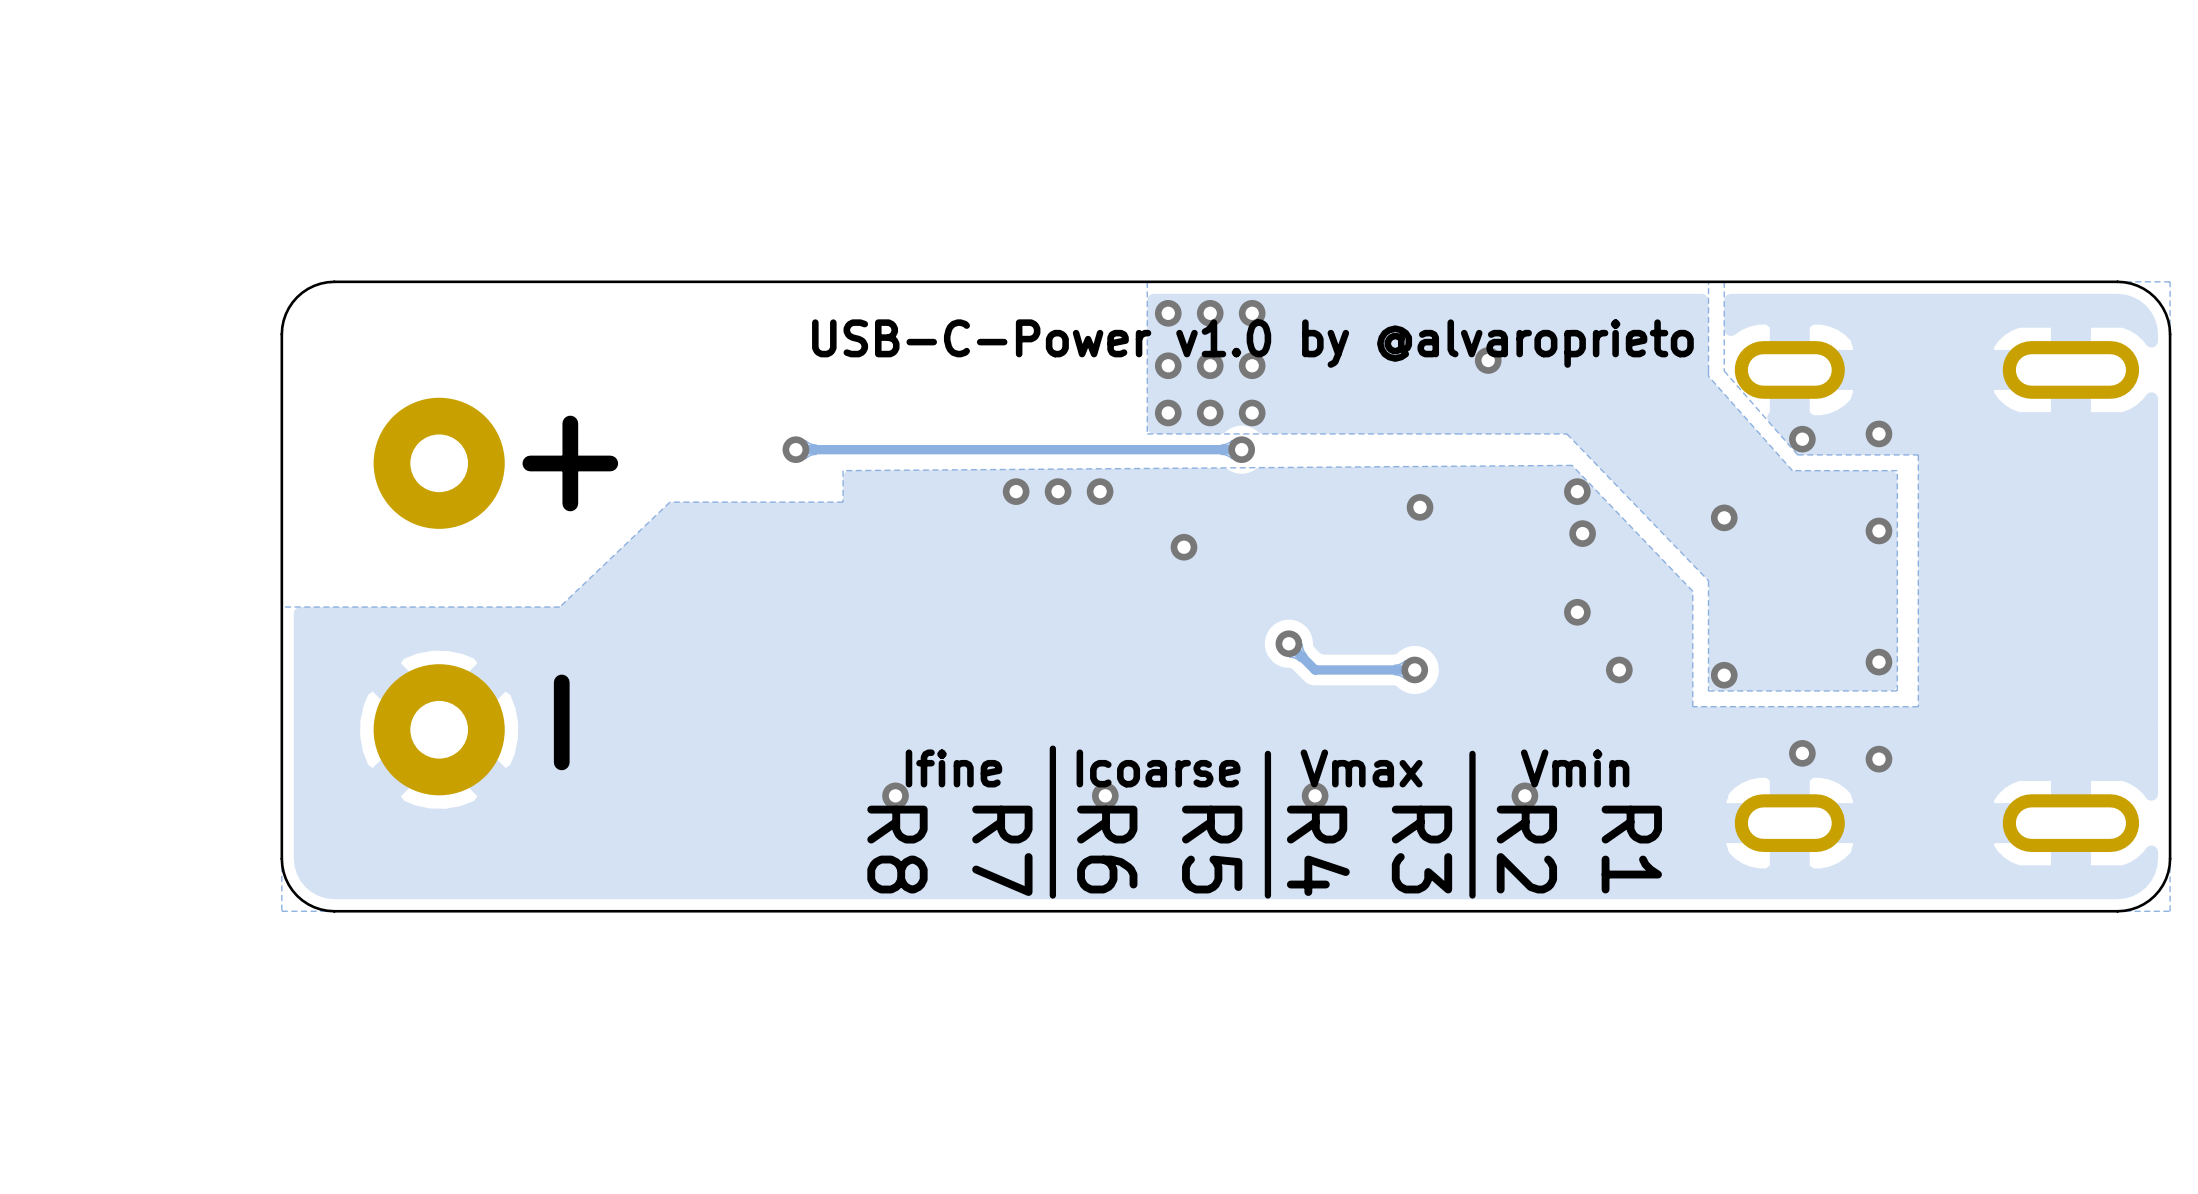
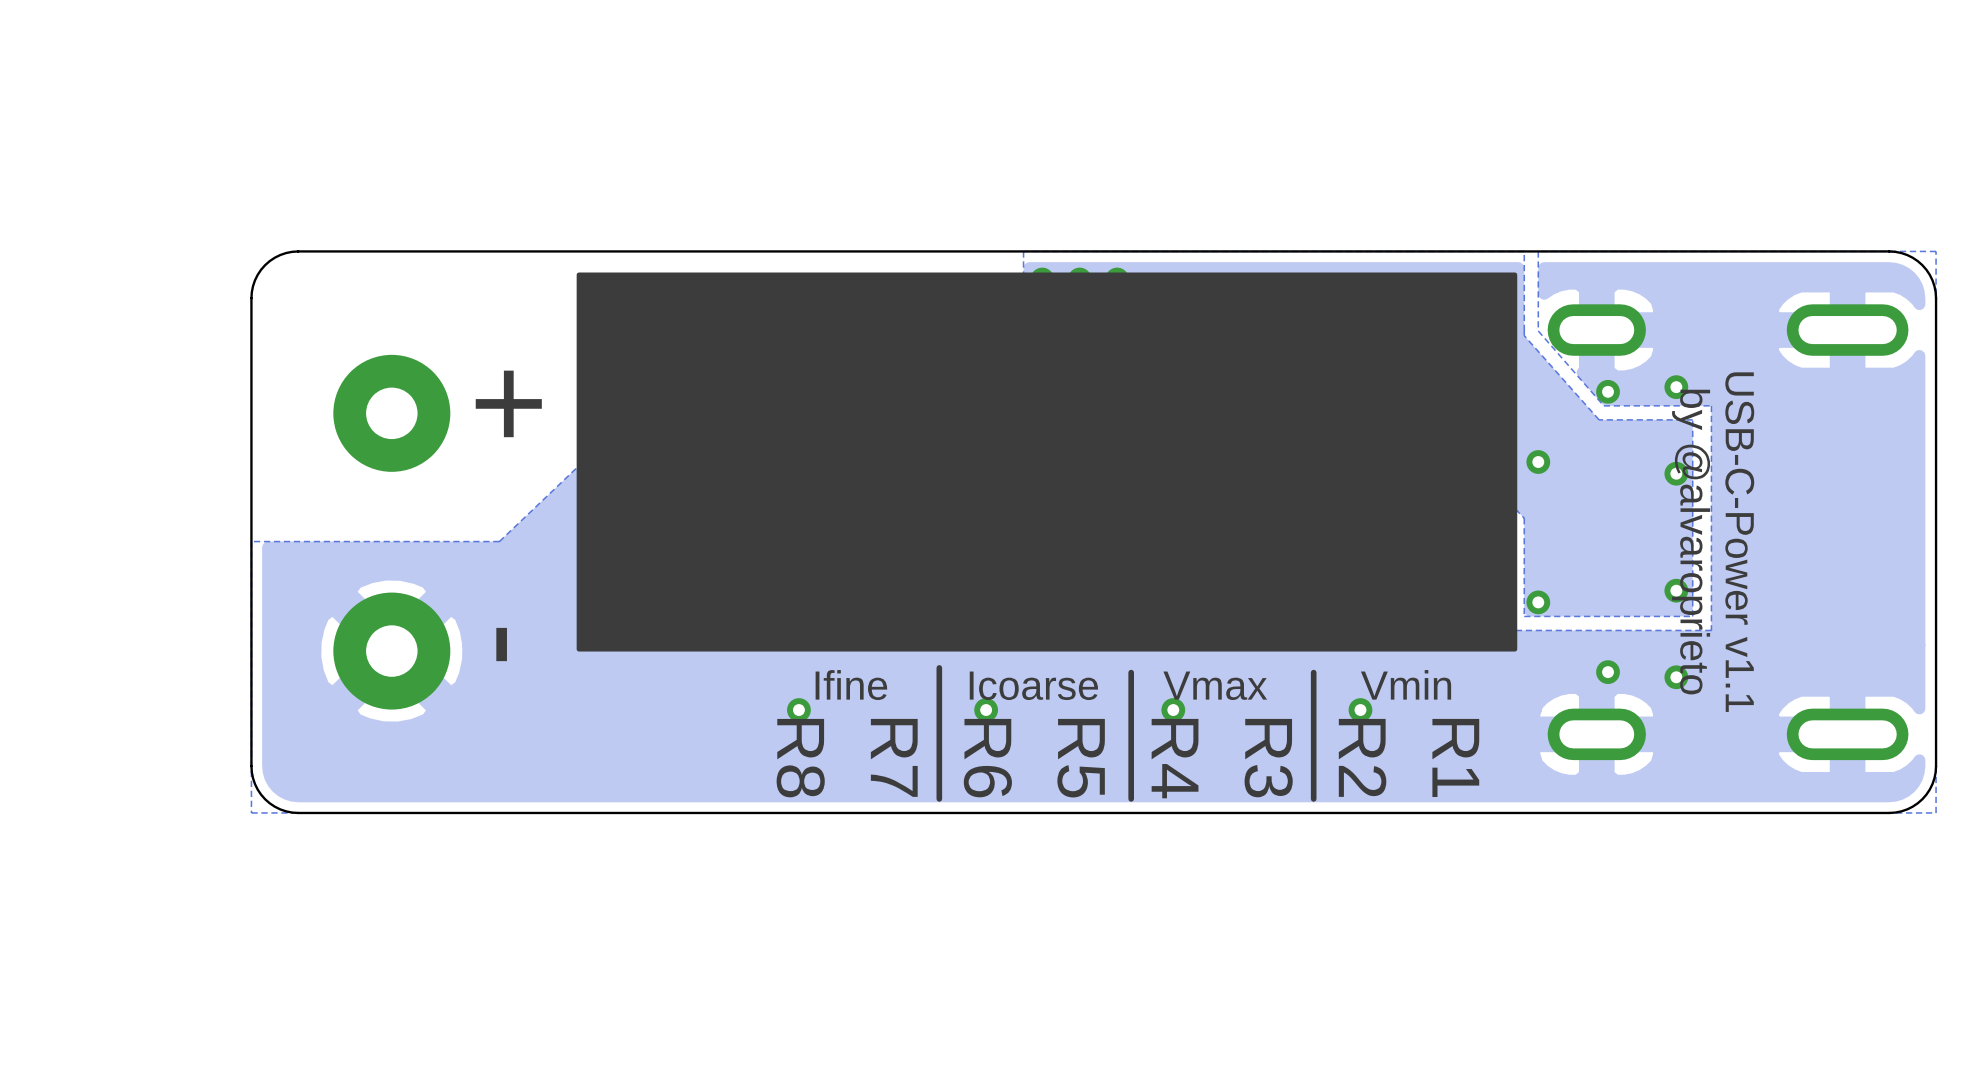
drawing: none -> [576, 272, 1518, 652]
text: USB-C-Power v1.0 by @alvaroprieto (1252, 343) -> none
text: none -> by @alvaroprieto (1691, 542)
text: none -> USB-C-Power v1.1 (1739, 542)

